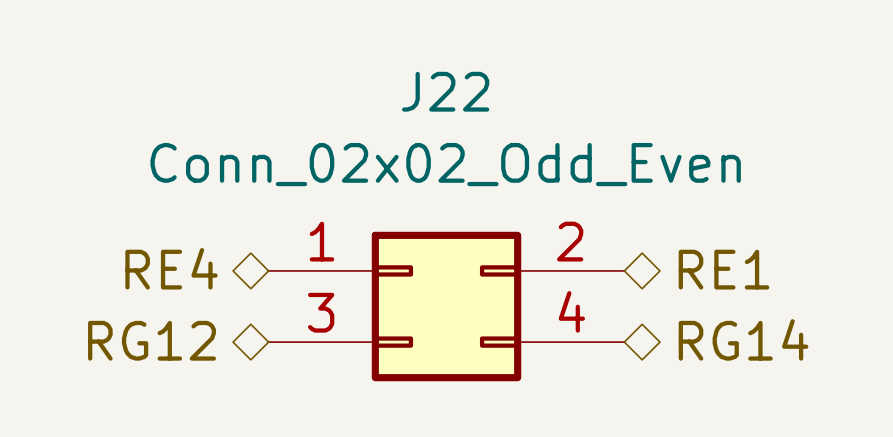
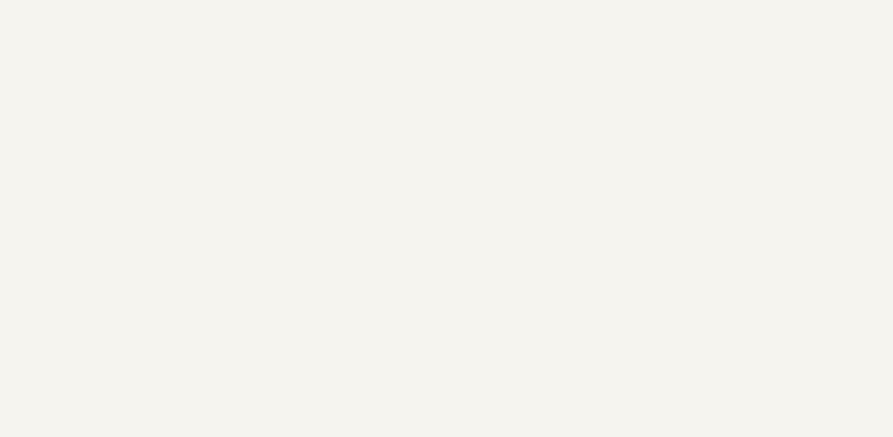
hierarchical label: RE4 (171, 268) -> none
hierarchical label: RE1 (724, 269) -> none
J22: Conn_02x02_Odd_Even (446, 306) -> none
hierarchical label: RG14 (743, 339) -> none
hierarchical label: RG12 (152, 340) -> none

